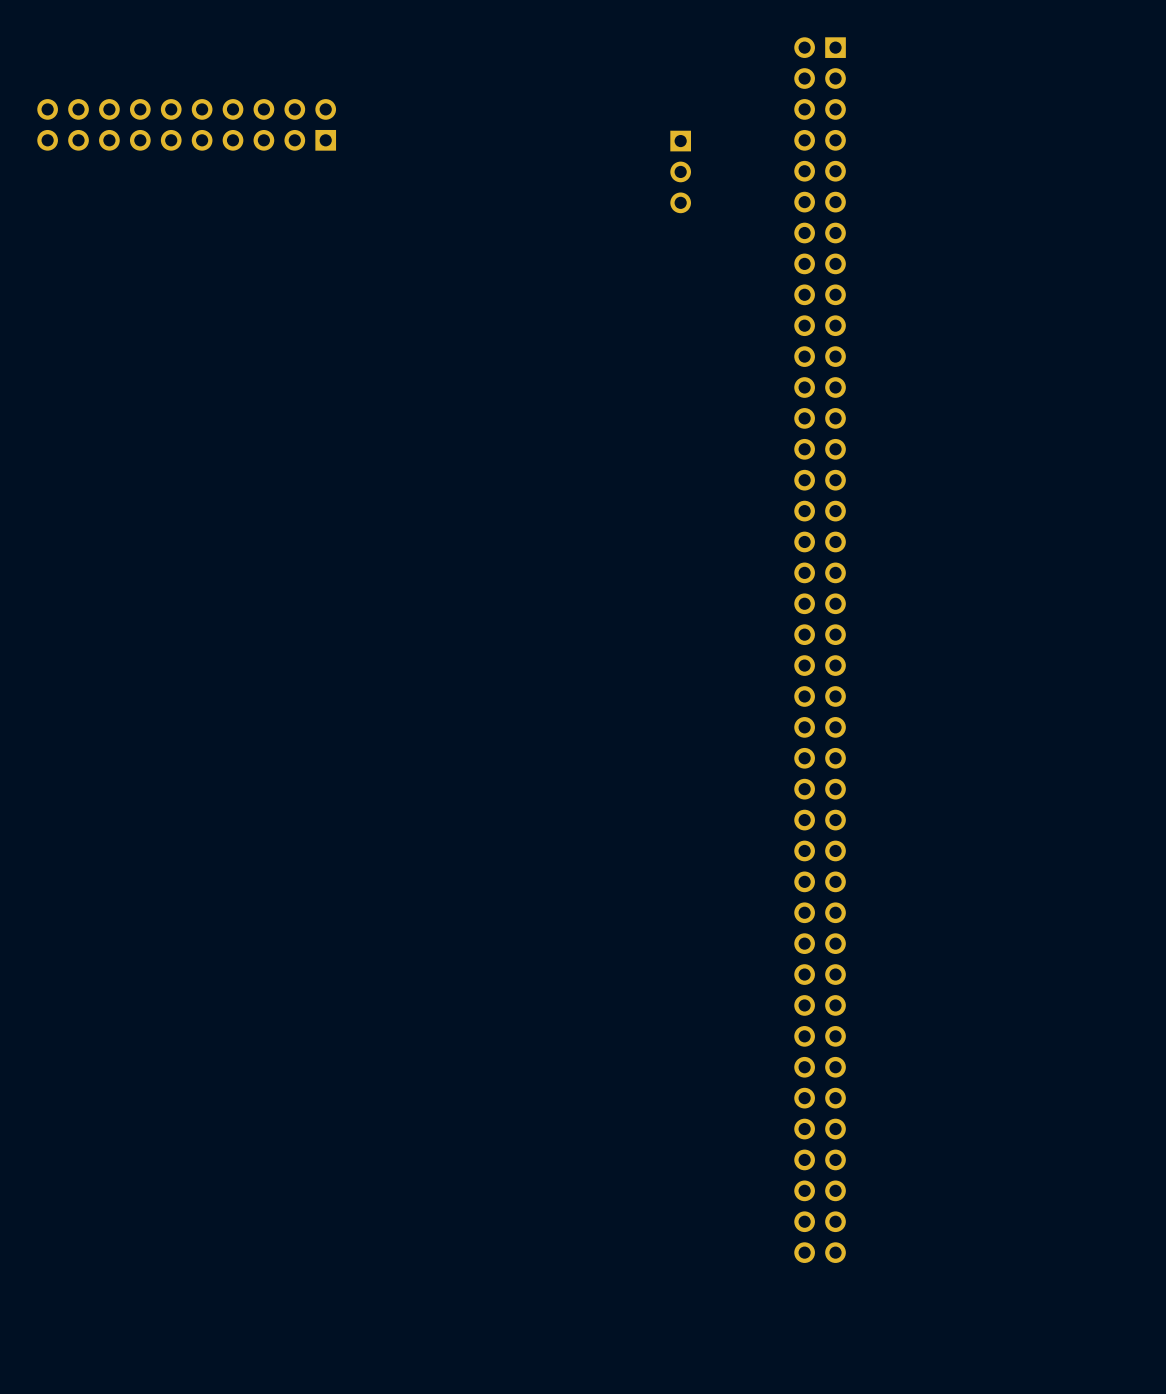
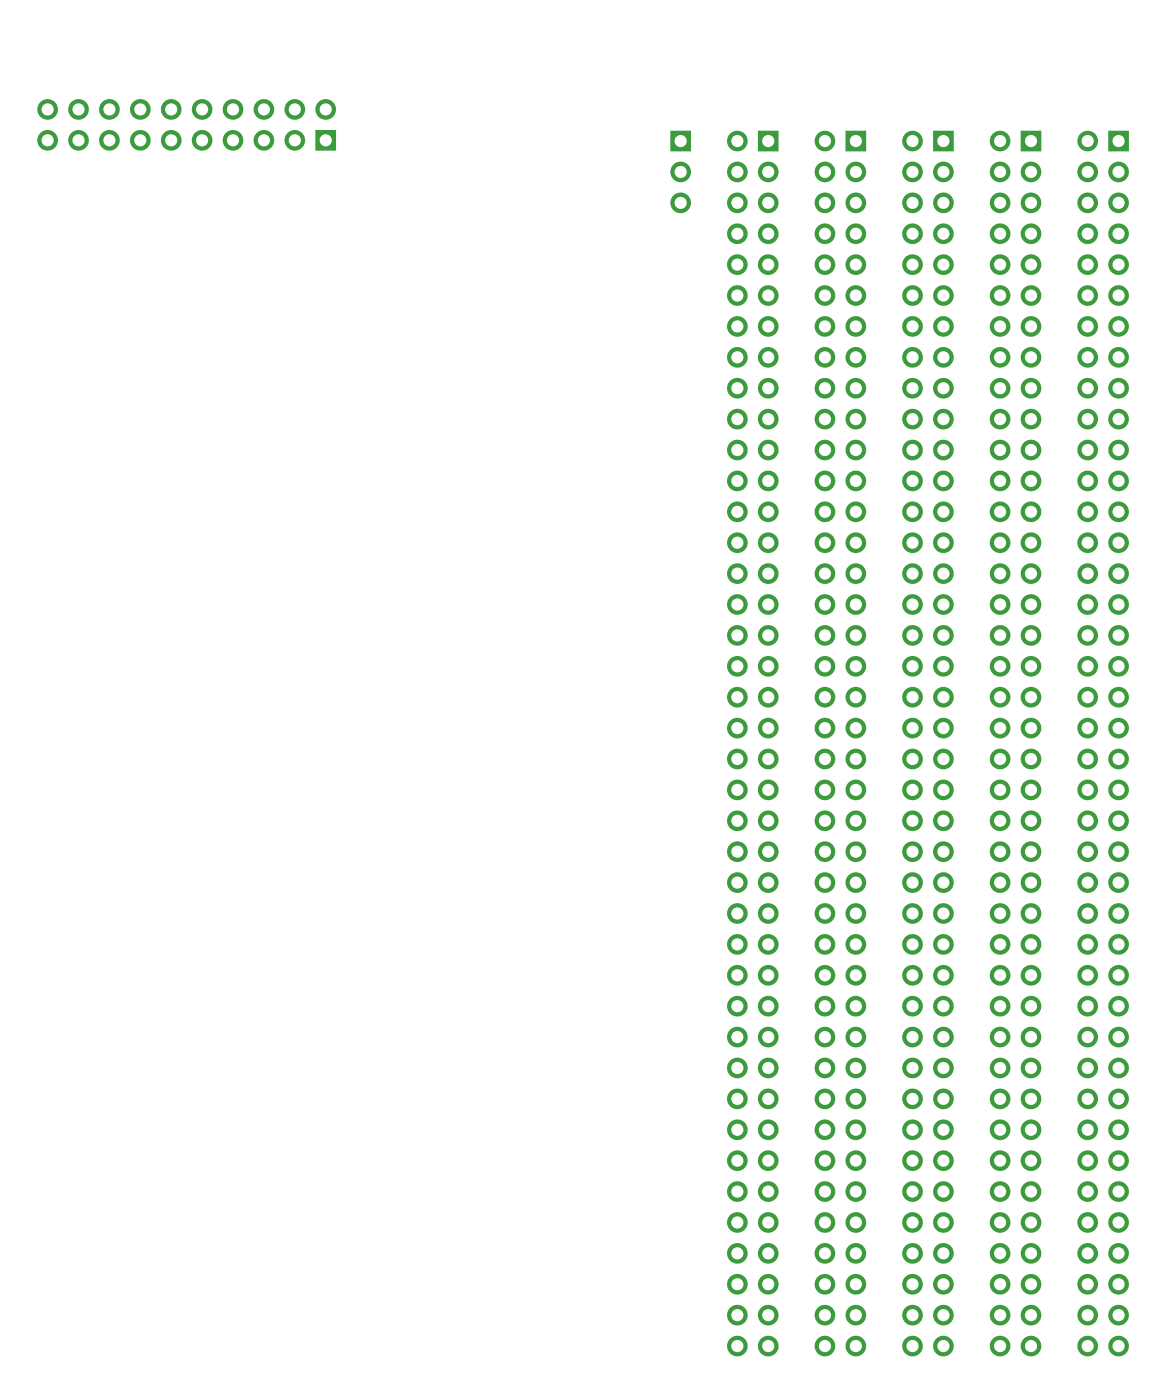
part: (820, 650) -> none
part: none -> (752, 743)
part: none -> (840, 743)
part: none -> (927, 743)
part: none -> (1015, 743)
part: none -> (1103, 743)

